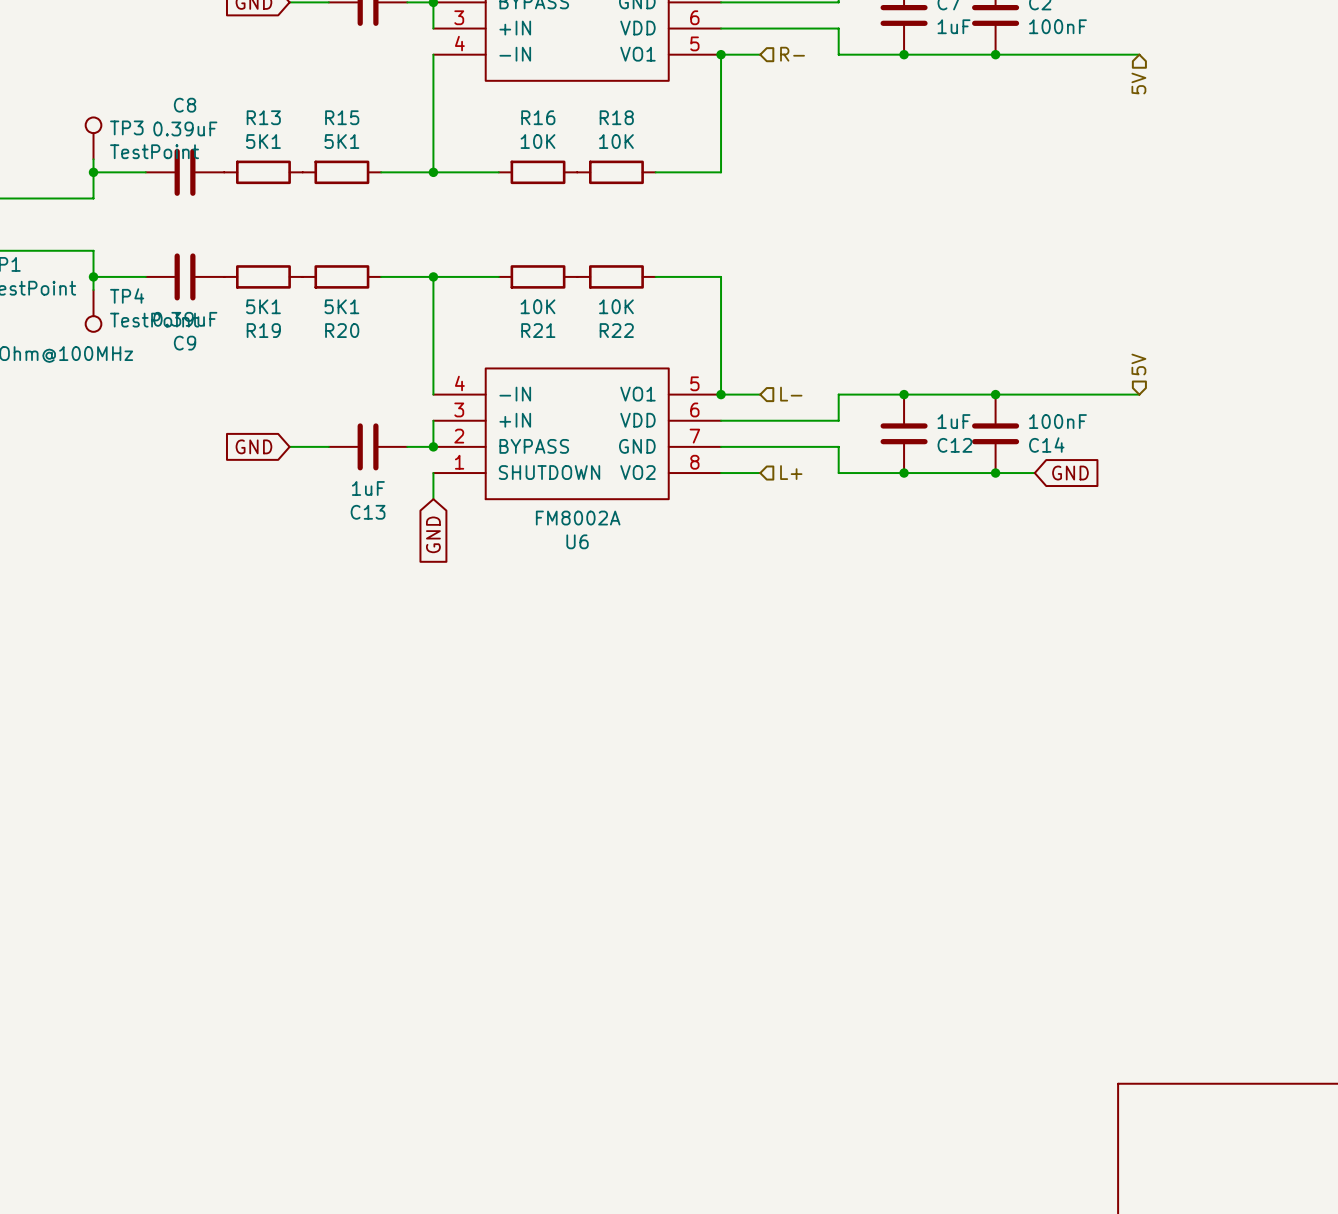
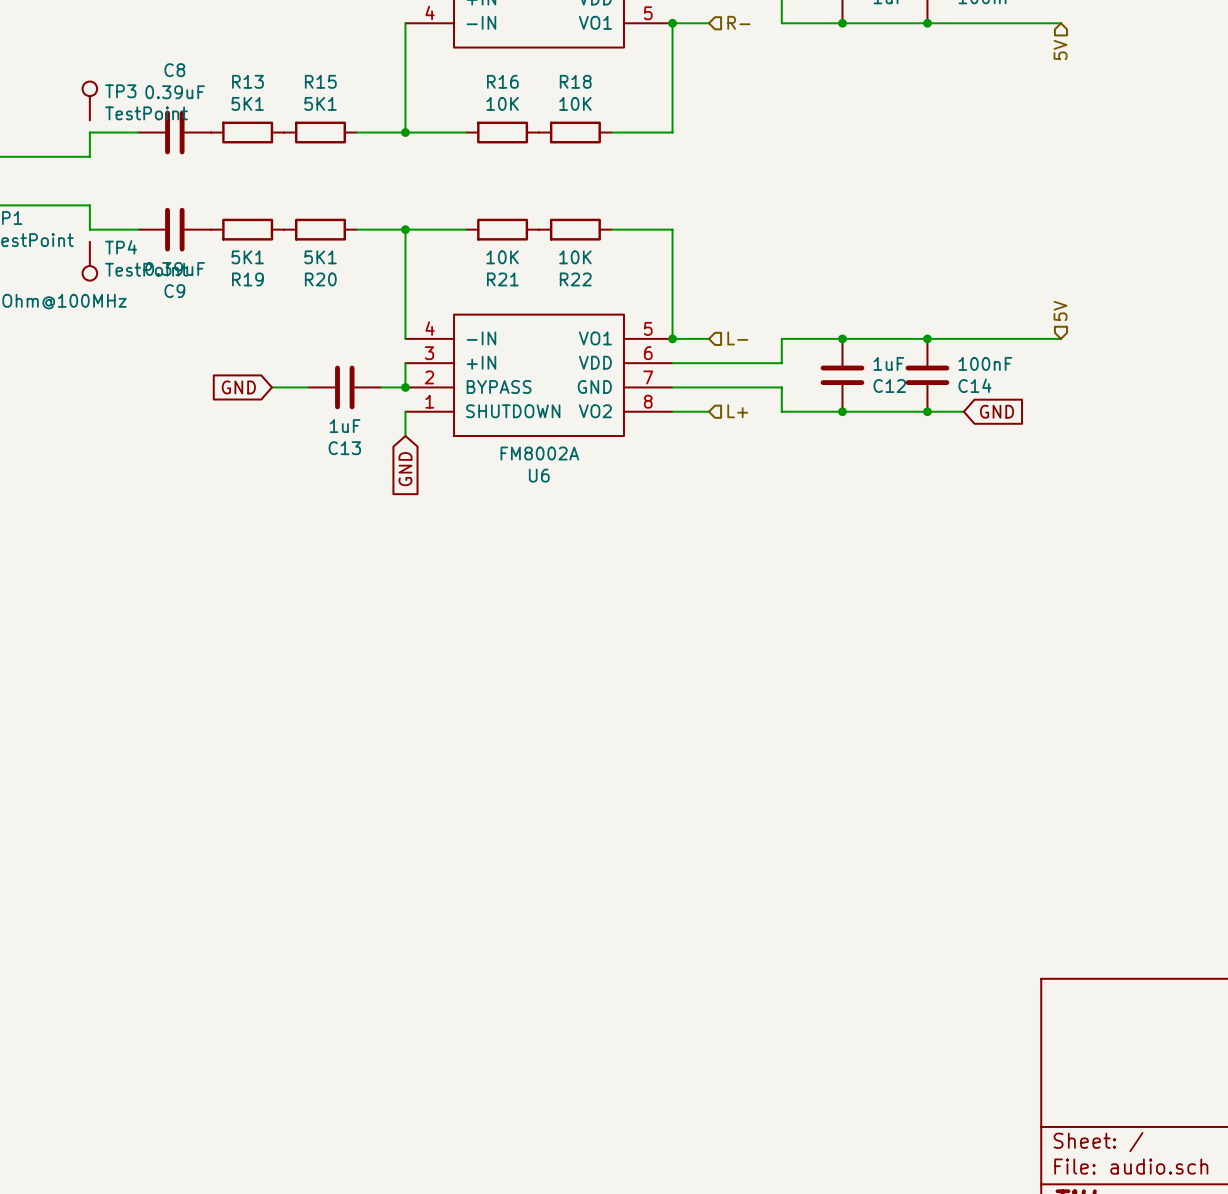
wire: (93, 159) (93, 172) -> none
junction: (93, 172) -> none
wire: (93, 276) (93, 290) -> none
junction: (93, 276) -> none

